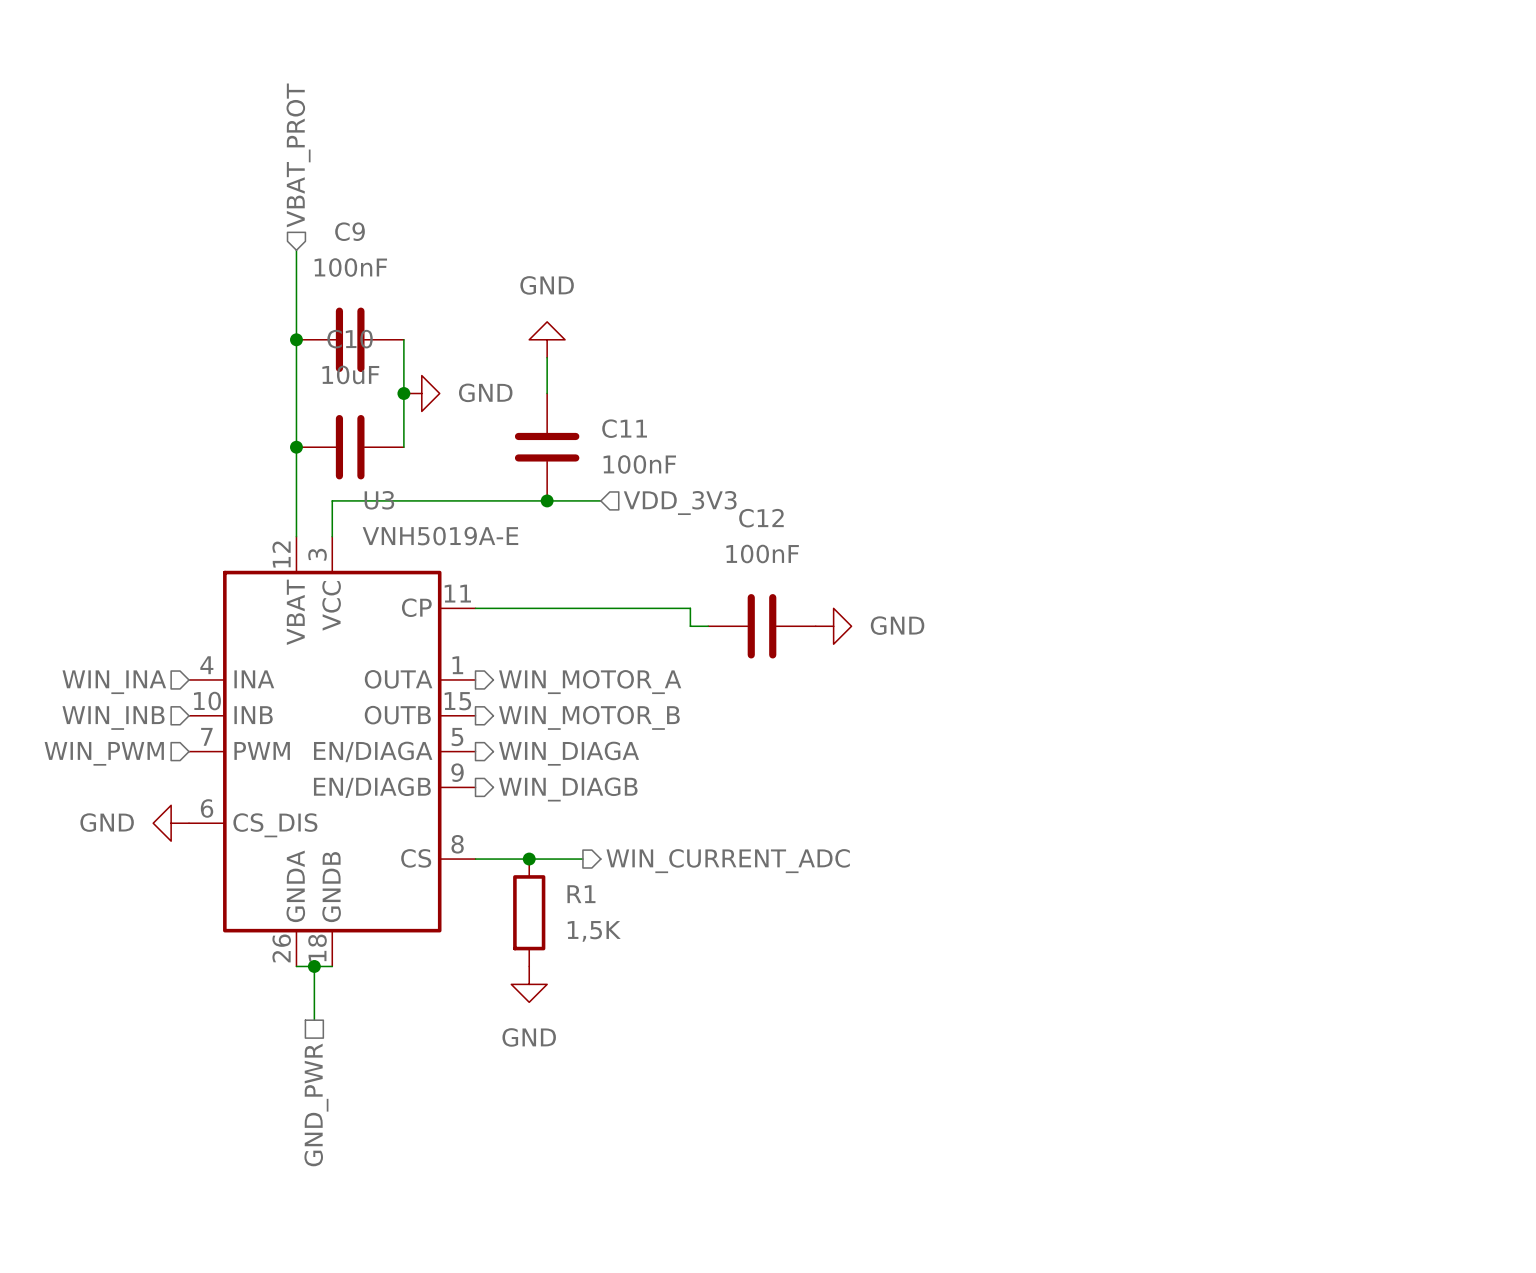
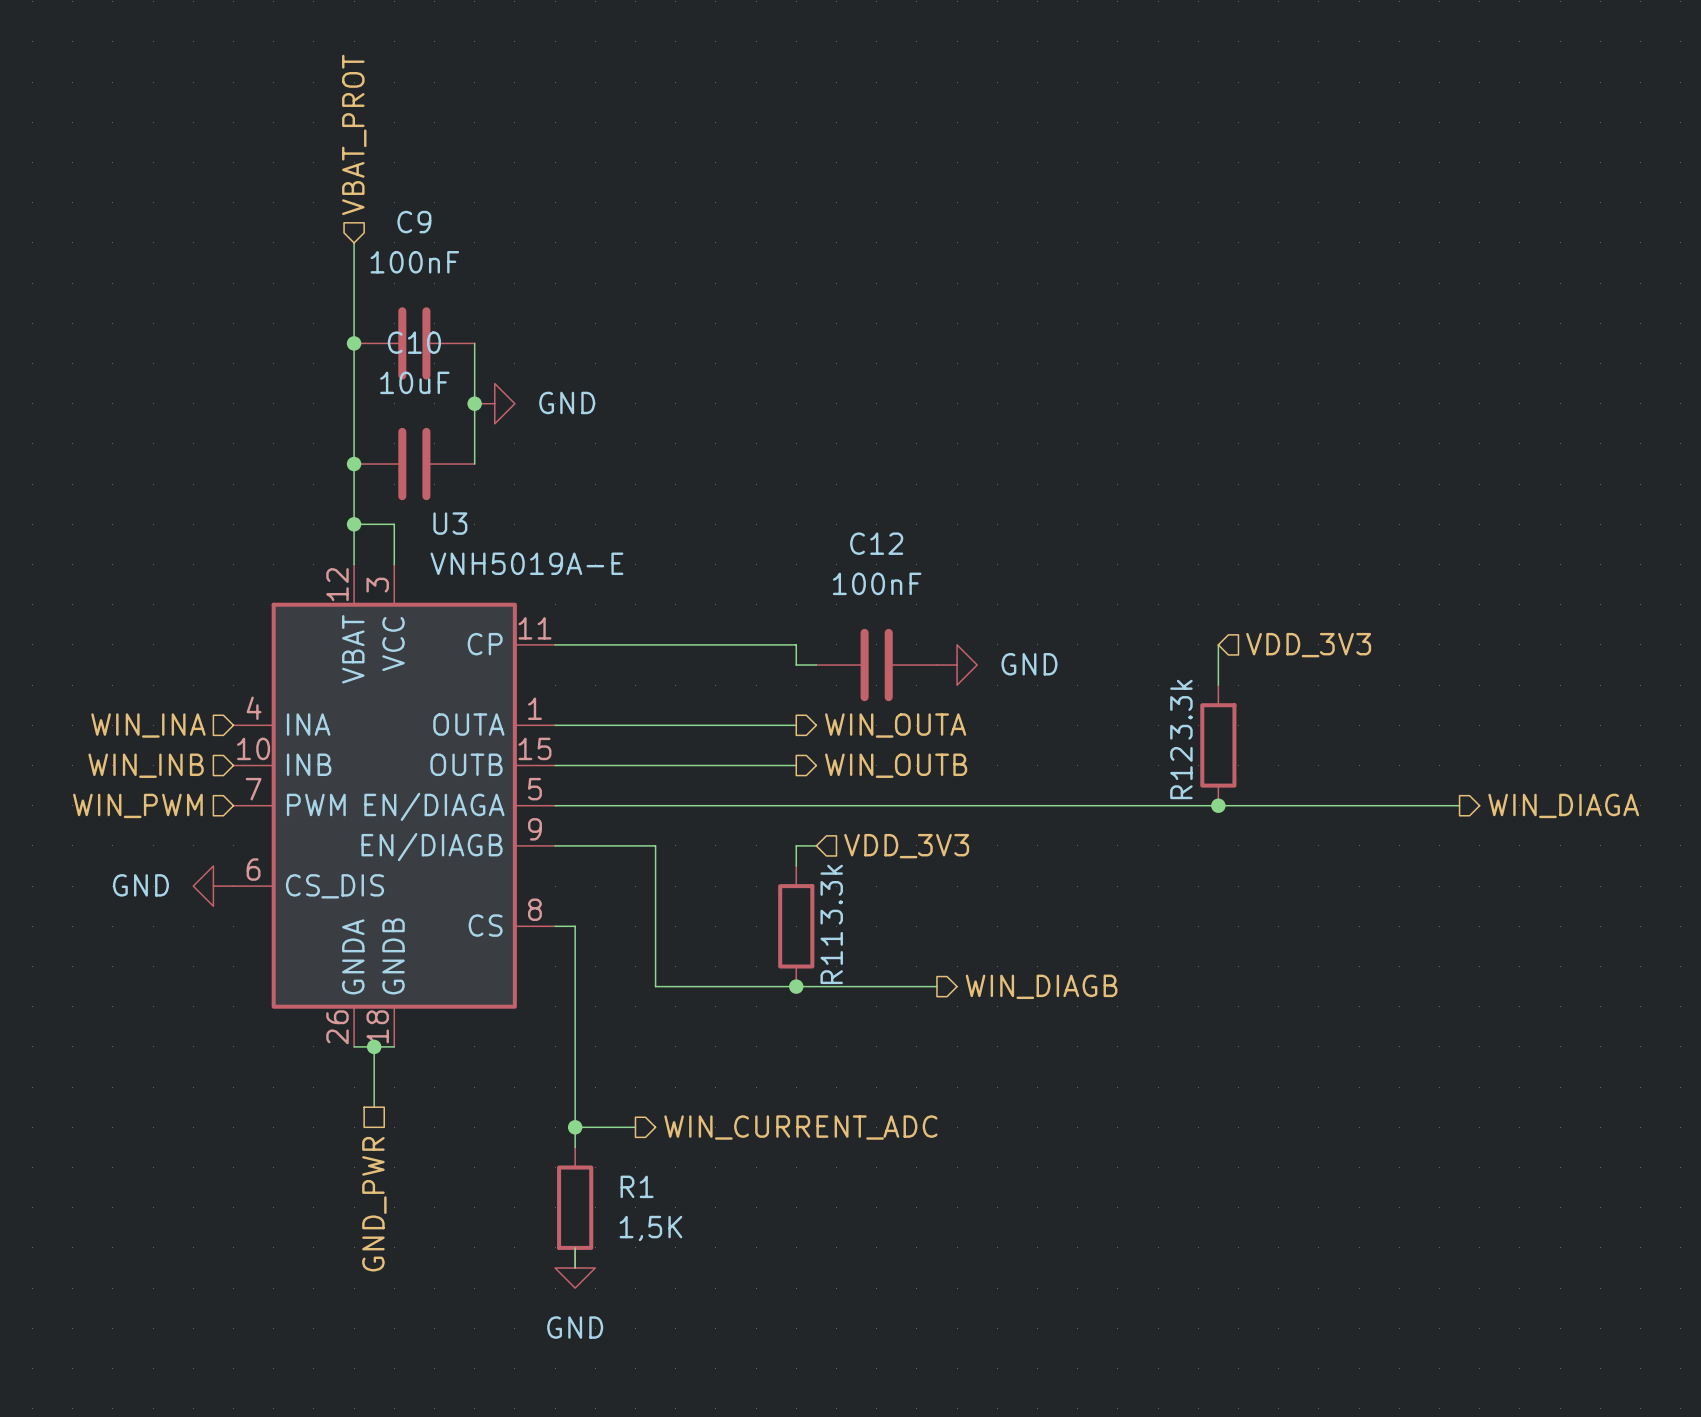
power symbol: GND (547, 339) -> none
wire: (547, 357) (547, 393) -> none
C11: 100nF (547, 447) -> none
junction: none -> (354, 524)
wire: (332, 500) (600, 500) -> (394, 524) (354, 524)
junction: (547, 500) -> none
hierarchical label: VDD_3V3 (680, 503) -> none
wire: none -> (1218, 644) (1218, 685)
hierarchical label: none -> VDD_3V3 (1308, 645)
wire: none -> (555, 725) (796, 725)
hierarchical label: WIN_MOTOR_A (590, 682) -> none
hierarchical label: none -> WIN_OUTA (895, 725)
R12: none -> 3.3k (1218, 745)
wire: none -> (555, 765) (796, 765)
hierarchical label: WIN_MOTOR_B (589, 717) -> none
hierarchical label: none -> WIN_OUTB (896, 765)
wire: none -> (555, 805) (1459, 805)
junction: none -> (1218, 805)
hierarchical label: WIN_DIAGA (569, 753) -> none
hierarchical label: none -> WIN_DIAGA (1563, 805)
wire: none -> (555, 845) (655, 845) (655, 986) (936, 986)
wire: none -> (816, 845) (796, 845) (796, 866)
hierarchical label: WIN_DIAGB (568, 789) -> none
hierarchical label: none -> VDD_3V3 (906, 846)
wire: (493, 859) (582, 859) -> (575, 926) (575, 1147)
junction: (529, 859) -> none
R11: none -> 3.3k (796, 926)
hierarchical label position: WIN_CURRENT_ADC (728, 861) -> WIN_CURRENT_ADC (800, 1127)
R1 position: (529, 912) -> (575, 1207)
junction: none -> (796, 986)
hierarchical label: none -> WIN_DIAGB (1041, 986)
power symbol position: GND (529, 984) -> GND (575, 1268)
wire: none -> (575, 1127) (635, 1127)
junction: none -> (575, 1127)
wire: none -> (575, 1247) (575, 1268)

